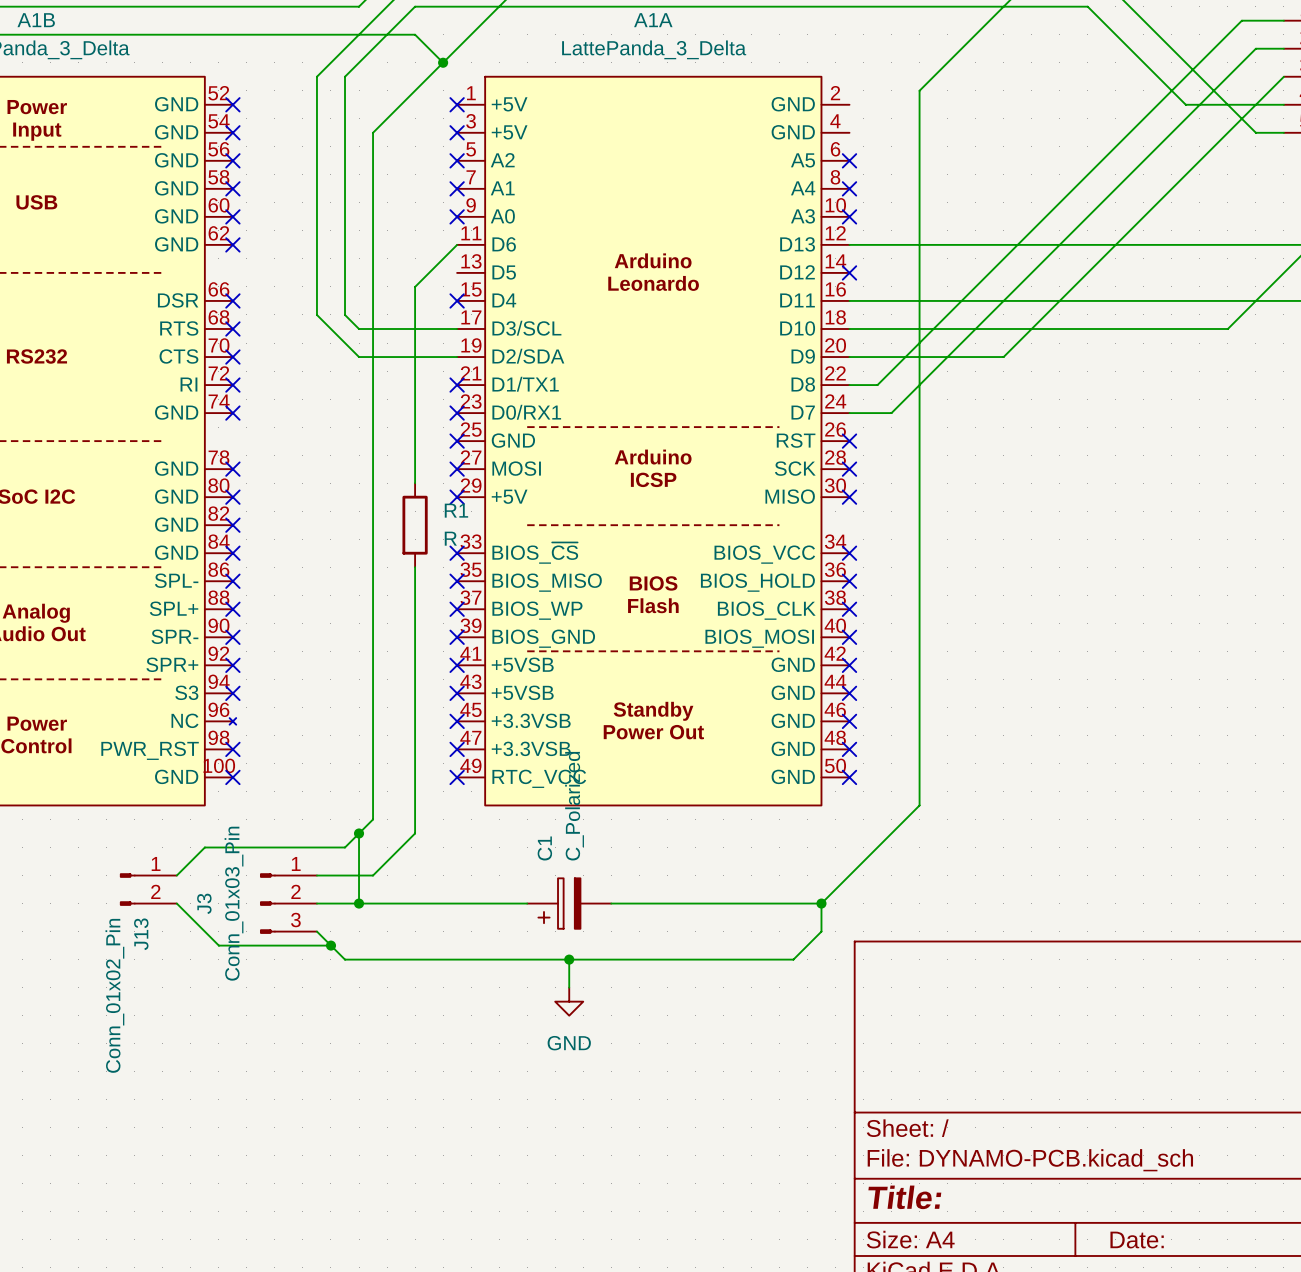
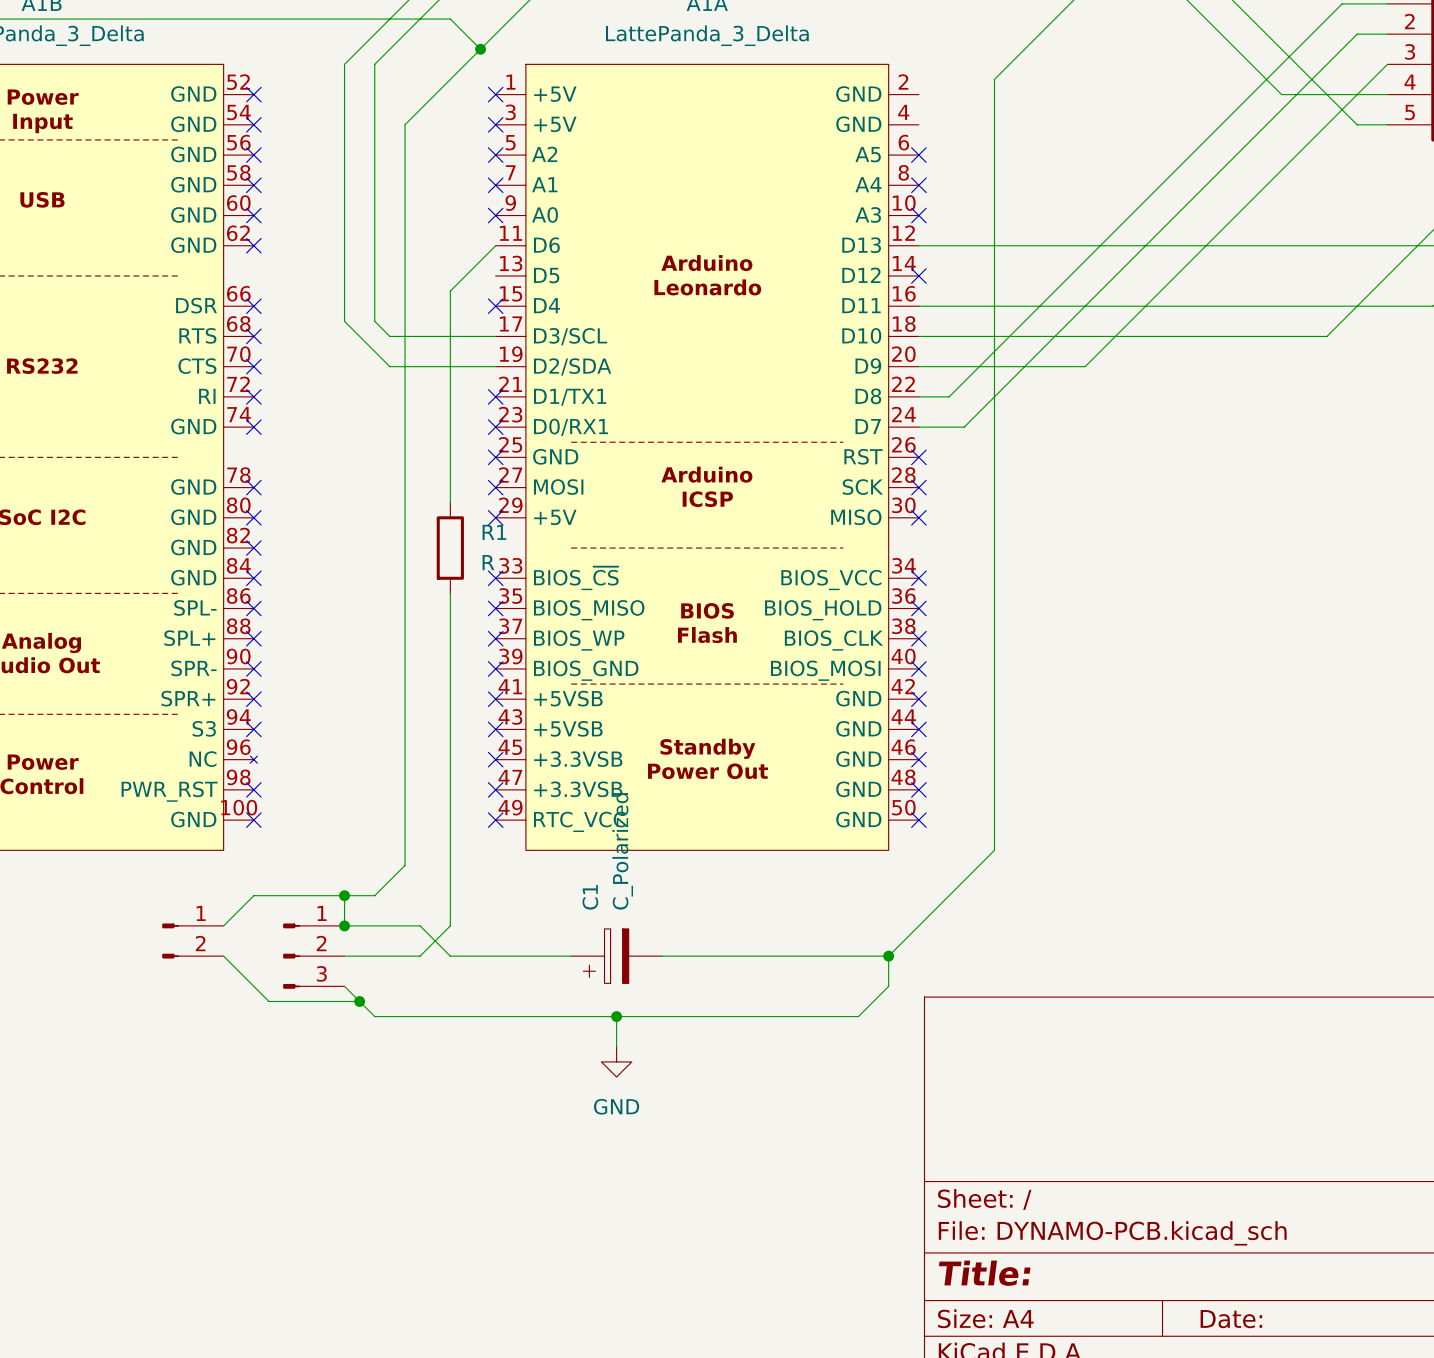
wire: (359, 833) (359, 903) -> none
junction: (359, 833) -> none
wire: (415, 833) (373, 875) -> (450, 880) (450, 925) (420, 956)
wire: (232, 847) (204, 847) (176, 875) -> (253, 895) (223, 925)
wire: none -> (344, 895) (344, 925)
junction: none -> (344, 895)
junction: none -> (344, 925)
J13: Conn_01x02_Pin (148, 889) -> none
part: none -> (192, 941)
wire: (176, 903) (218, 945) (246, 945) -> (223, 956) (268, 1001)
J3 name: J3 (204, 903) -> none
J3 value: Conn_01x03_Pin (234, 903) -> none
junction: (359, 903) -> none
wire: (387, 903) (415, 903) -> (405, 925) (420, 925) (450, 956)

